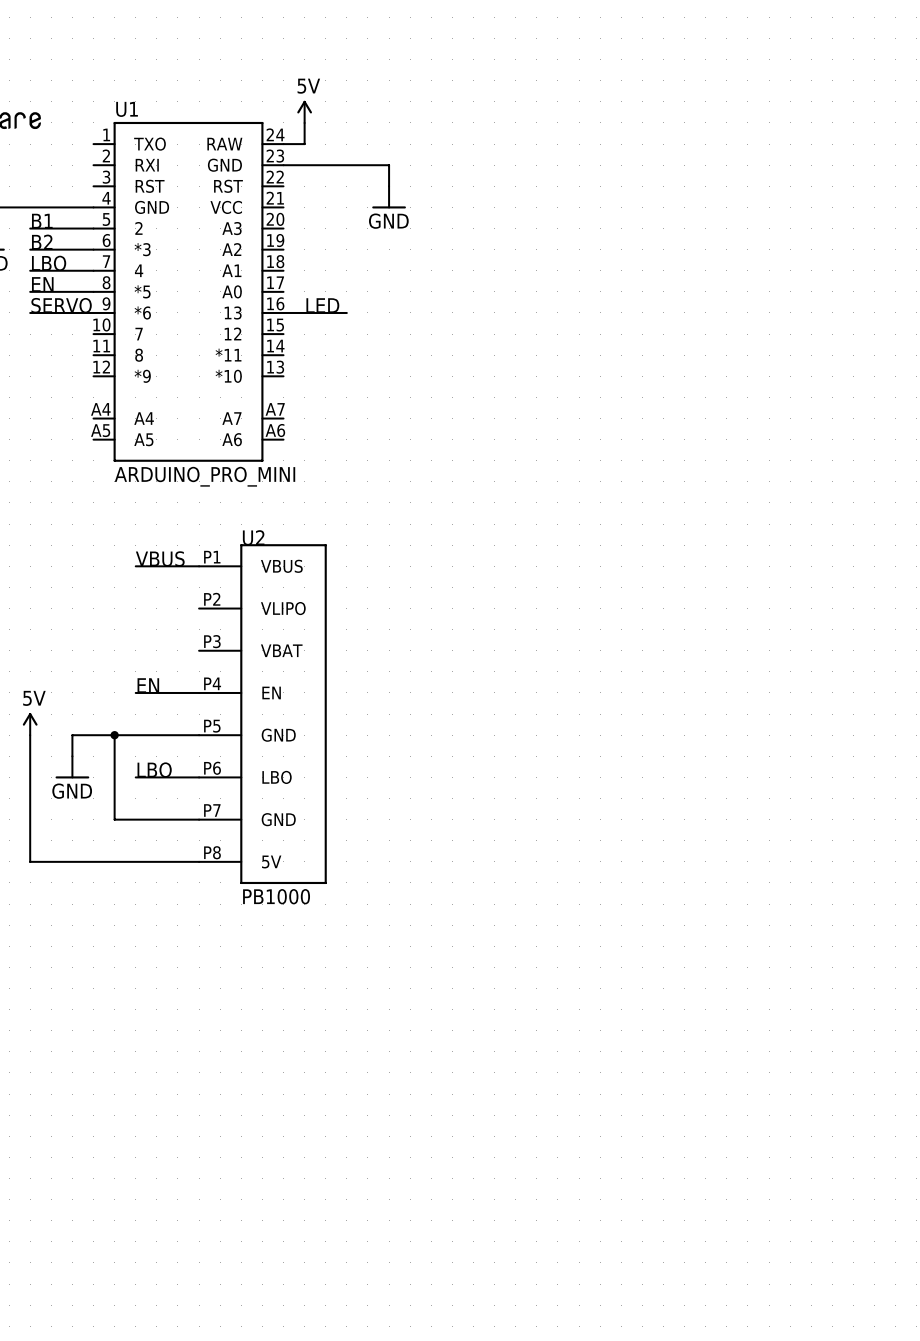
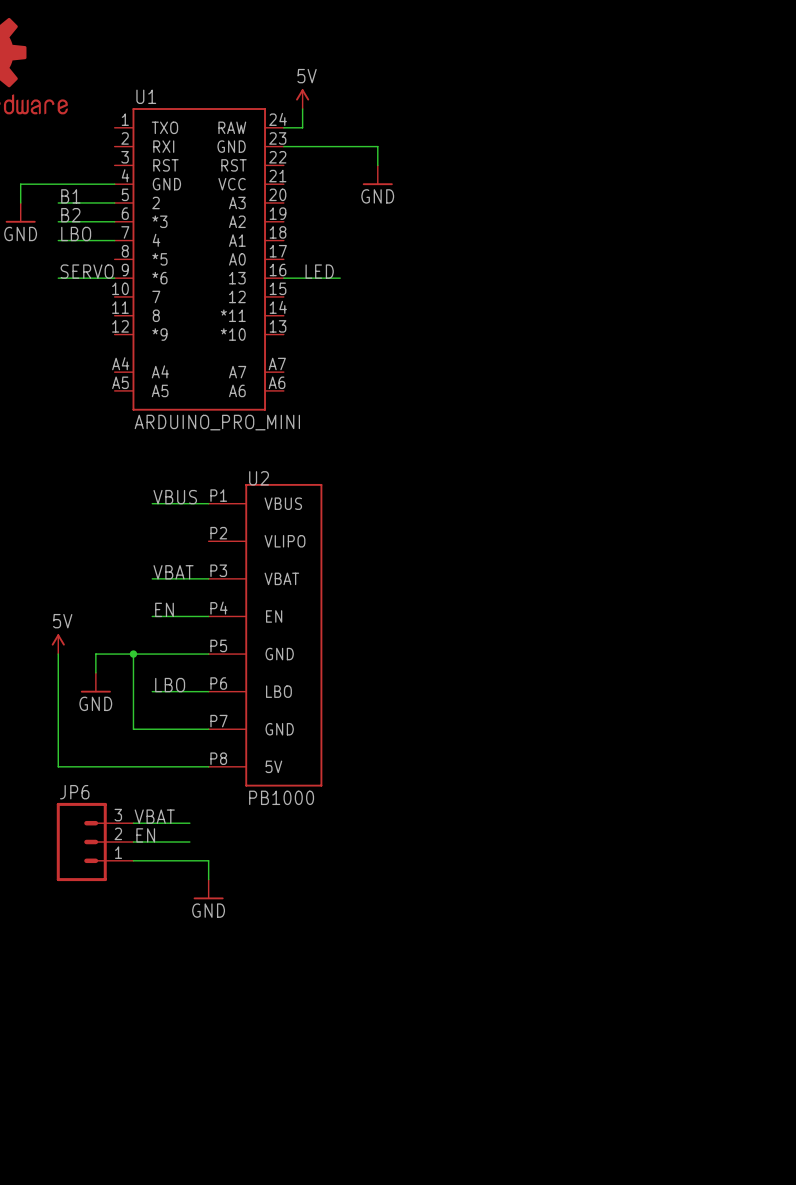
label: EN (42, 284) -> none
wire: (30, 291) (93, 291) -> none
label: none -> VBAT (173, 572)
wire: none -> (152, 578) (208, 578)
label: none -> VBAT (154, 816)
wire: none -> (133, 823) (189, 823)
label: none -> EN (145, 835)
JP6: none -> (95, 842)
wire: none -> (133, 842) (189, 842)
wire: none -> (133, 860) (208, 860) (208, 879)
power symbol: none -> GND (208, 889)

